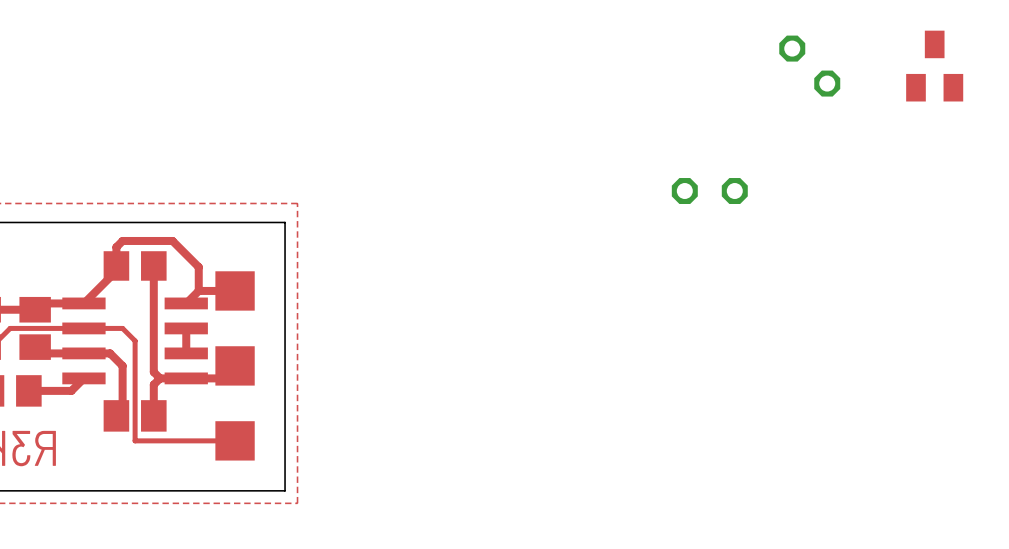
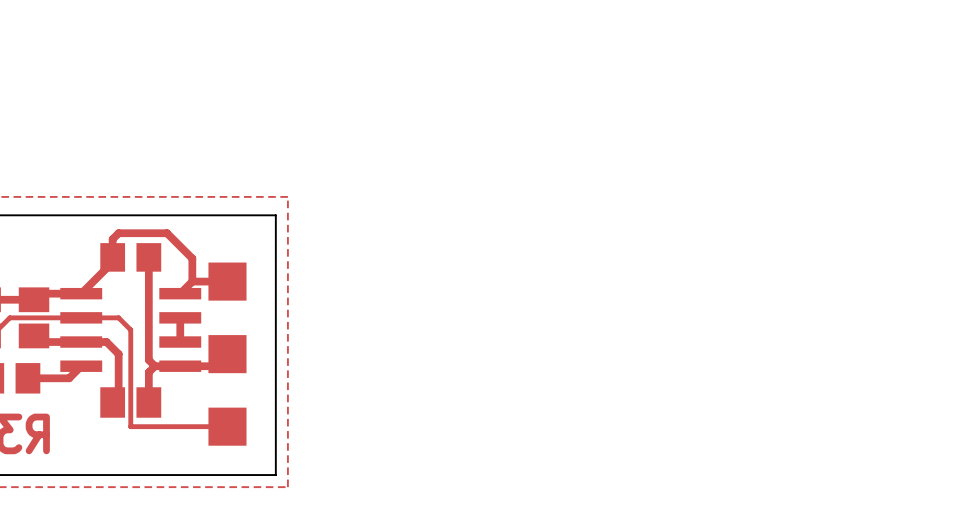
part: (809, 66) -> none
part: (934, 66) -> none
part: (709, 191) -> none

